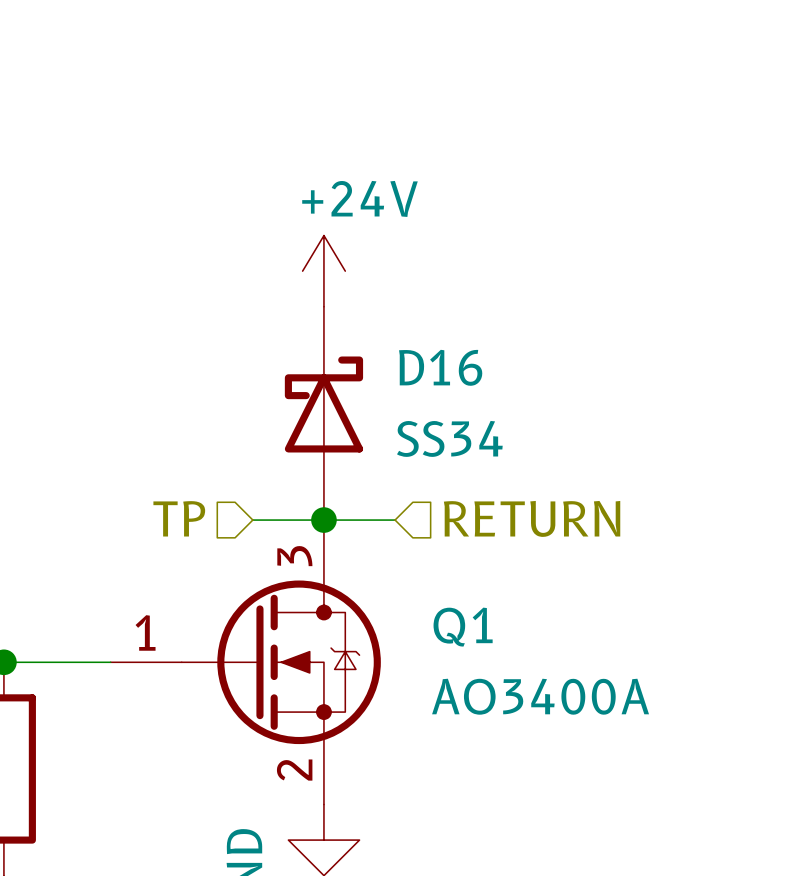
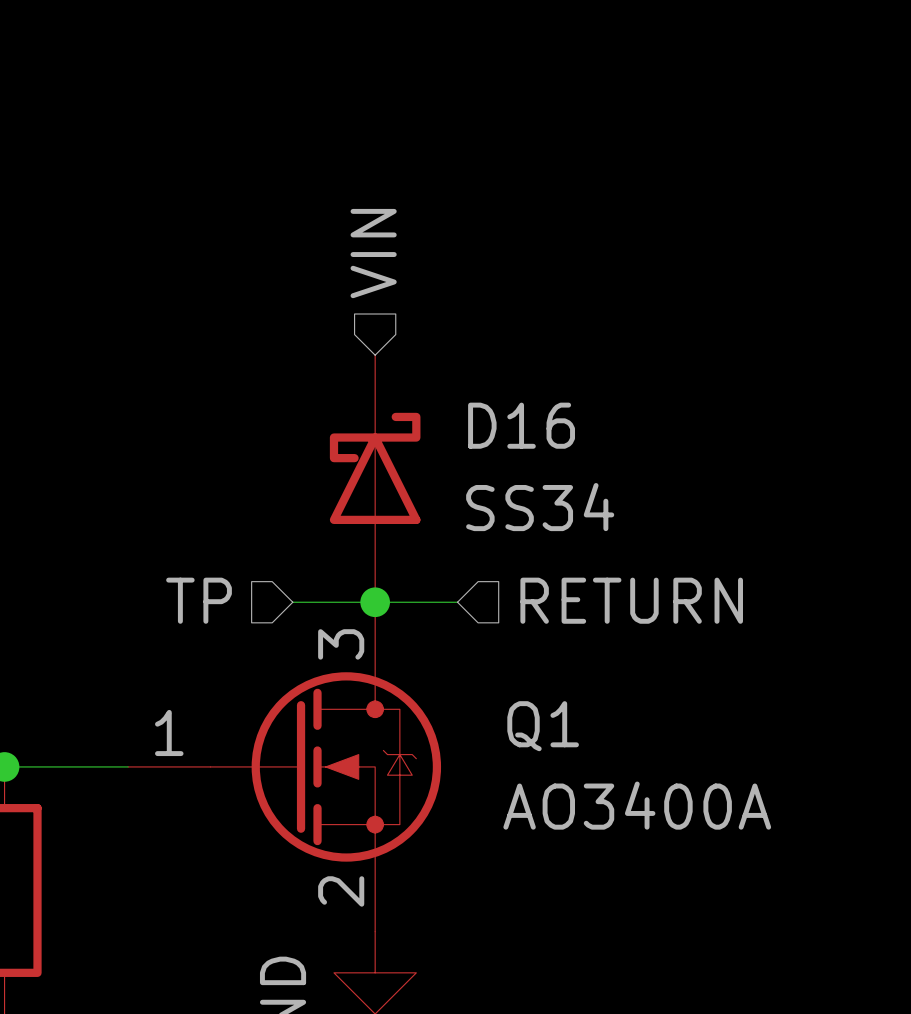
hierarchical label: none -> VIN (373, 253)
power symbol: +24V (323, 271) -> none

